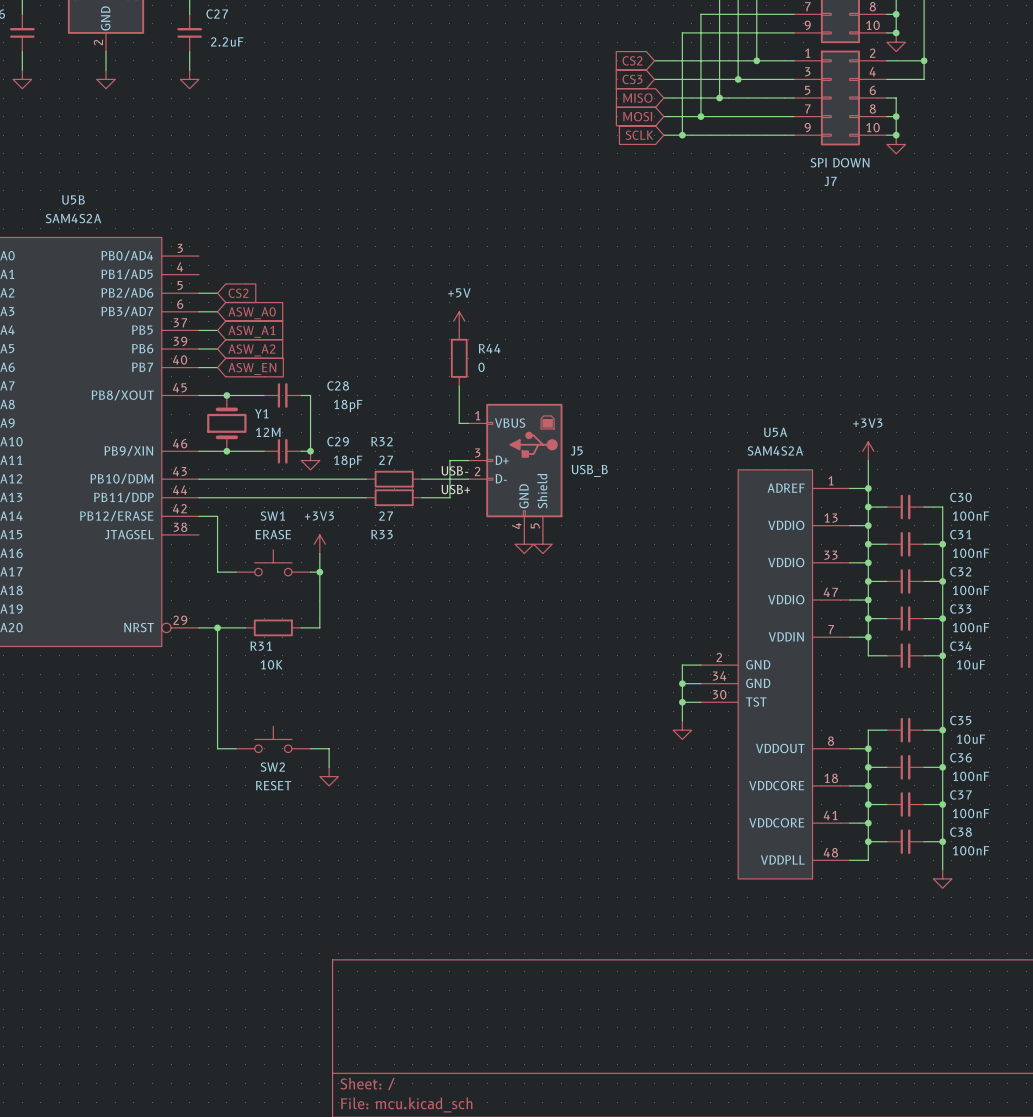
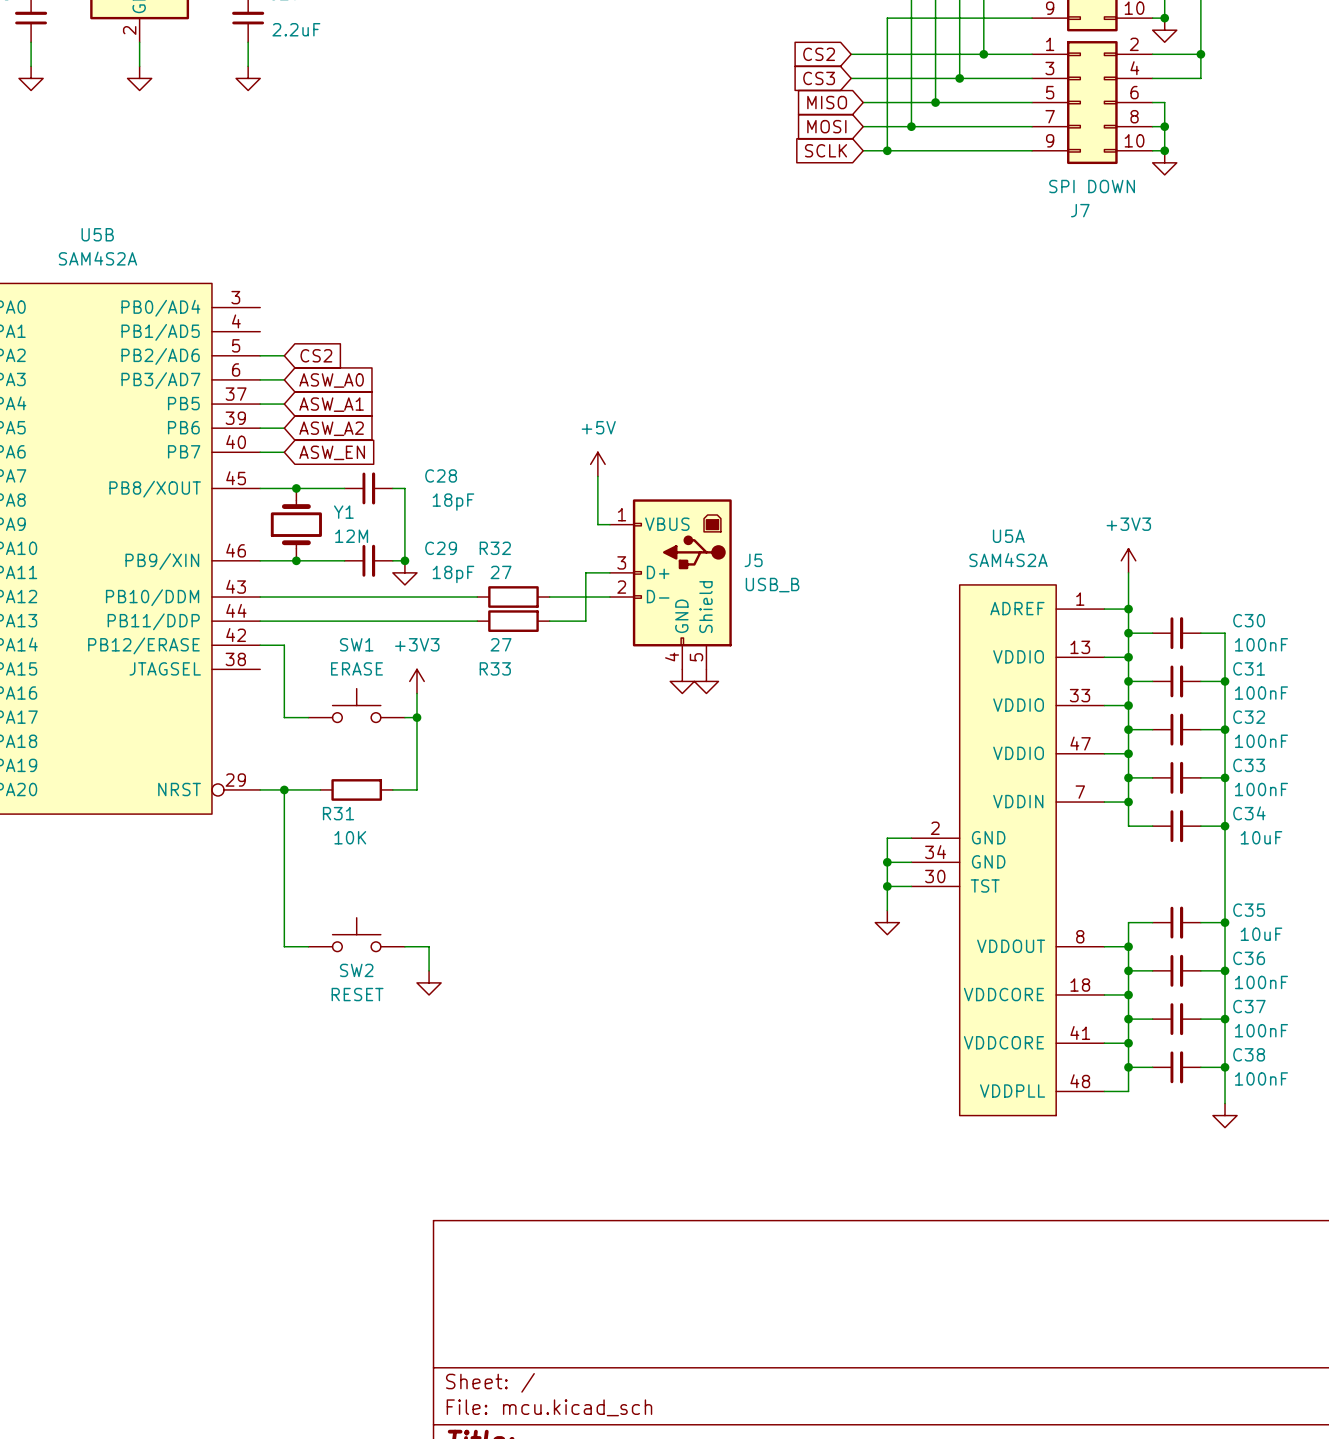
power symbol position: +5V (459, 321) -> +5V (597, 464)
R44: 0 (459, 358) -> none
label: USB- (454, 470) -> none
label: USB+ (455, 489) -> none

